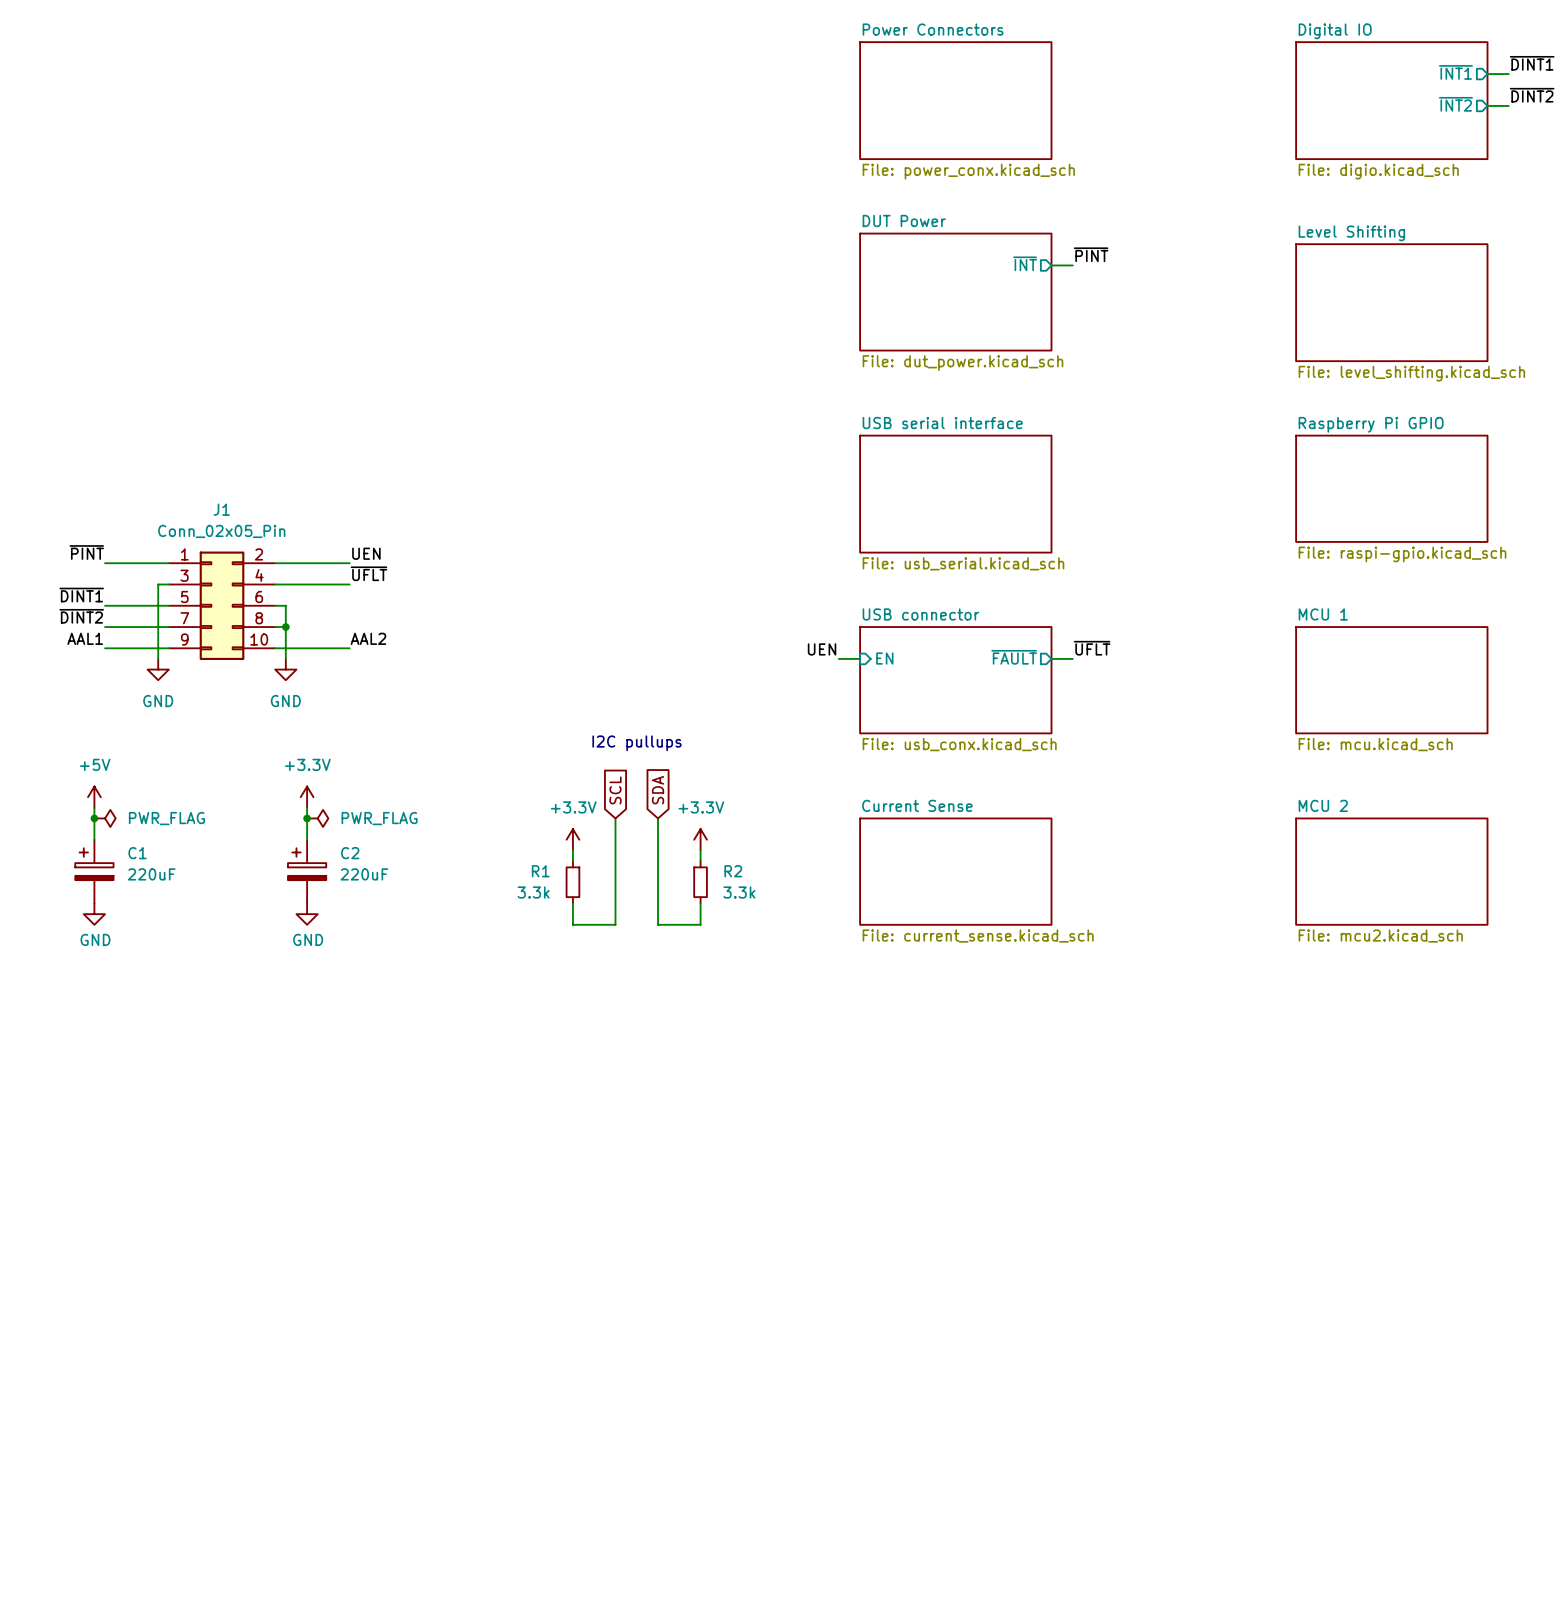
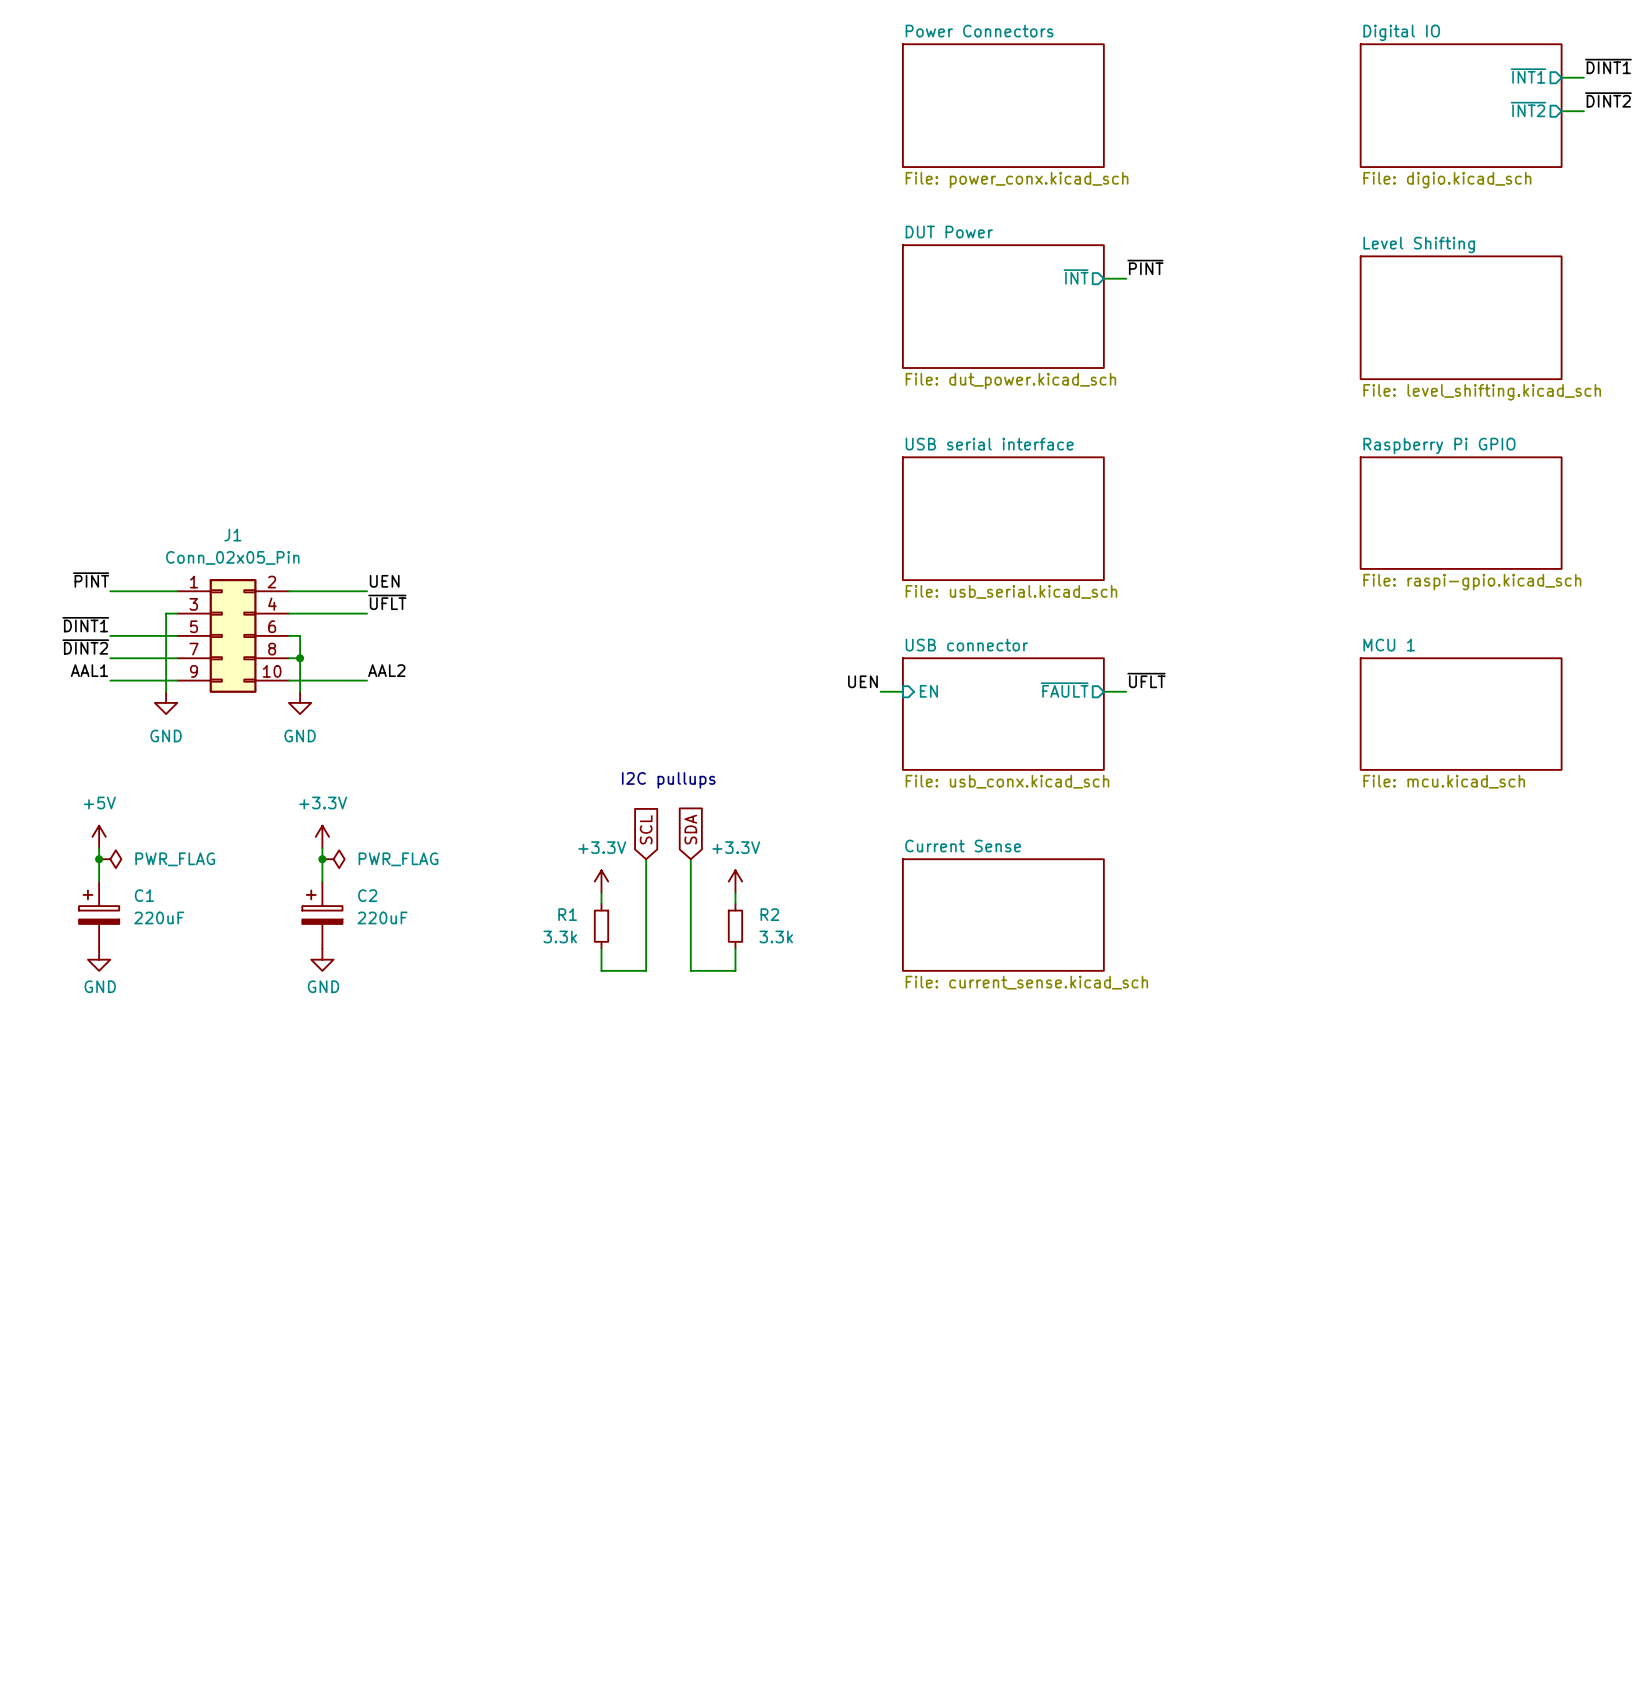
sheet MCU 2: File: mcu2.kicad_sch (1391, 871) -> none

